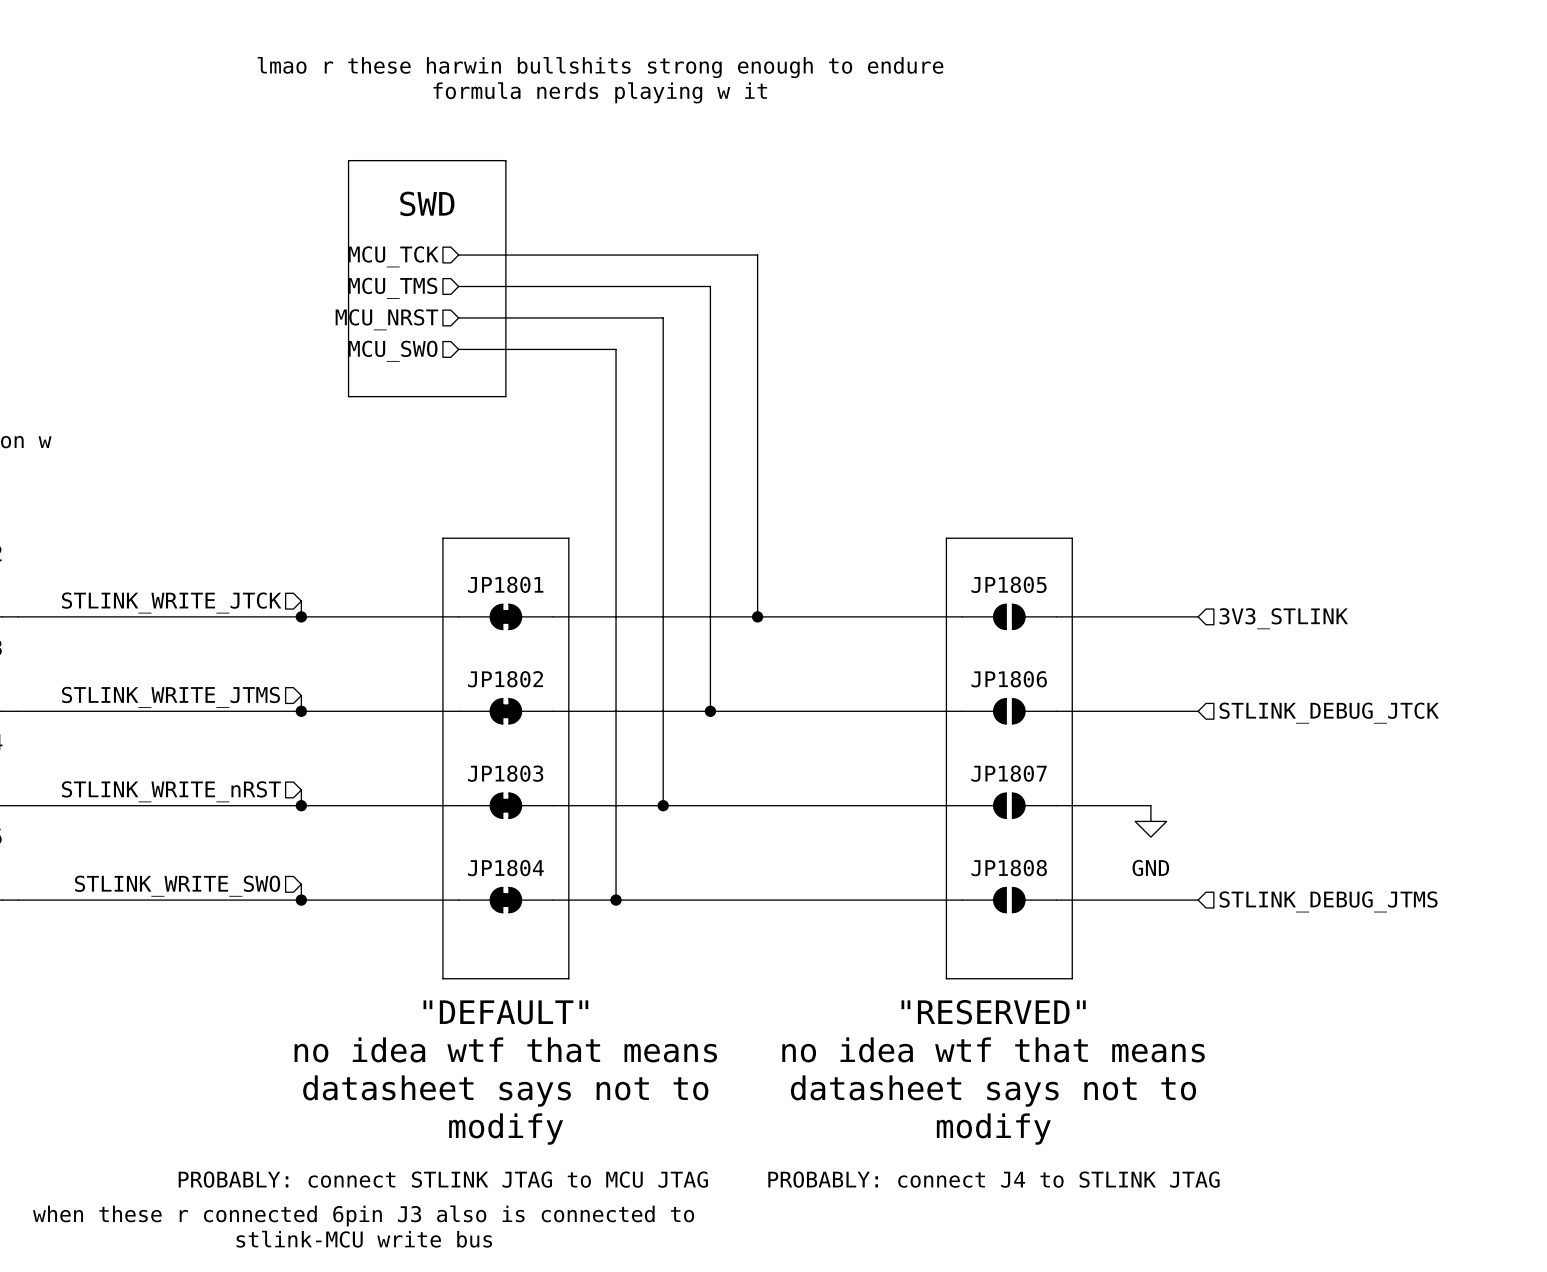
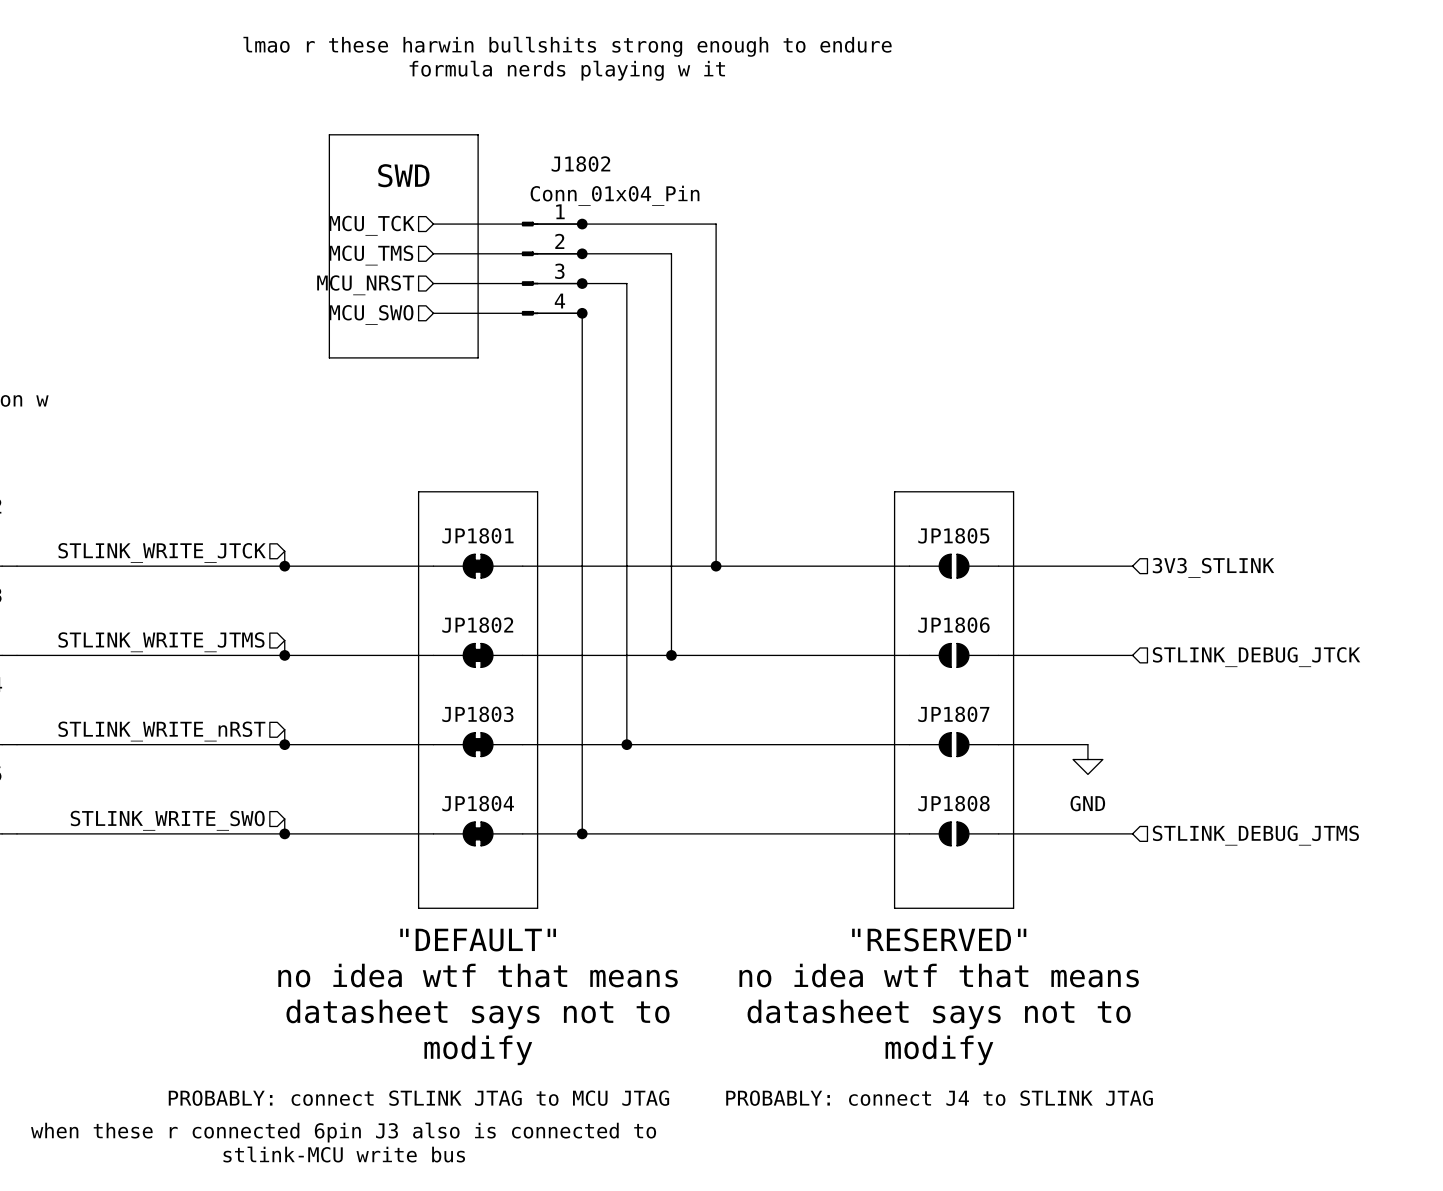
junction: none -> (582, 224)
junction: none -> (582, 253)
J1802: none -> Conn_01x04_Pin (552, 268)
junction: none -> (582, 283)
junction: none -> (582, 313)

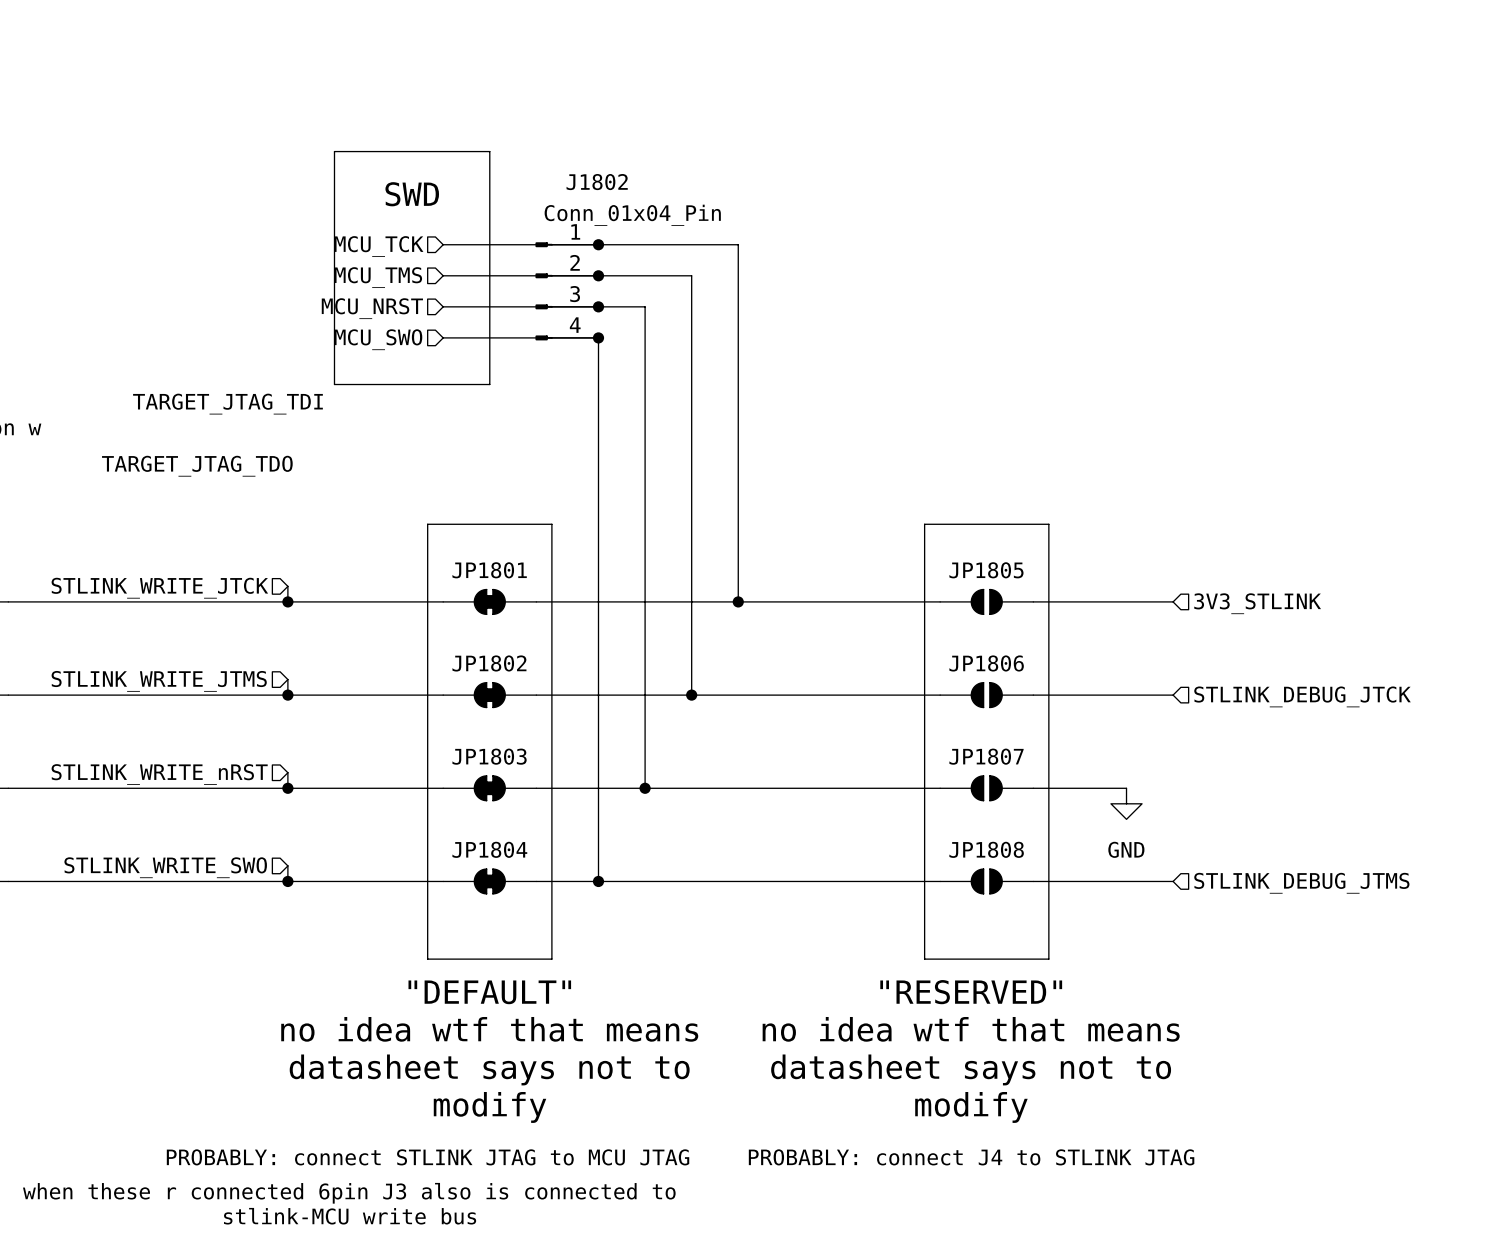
text: lmao r these harwin bullshits strong enough to endure (567, 46) -> none
text: formula nerds playing w it (567, 70) -> none
label: none -> TARGET_JTAG_TDI (227, 404)
label: none -> TARGET_JTAG_TDO (197, 466)

